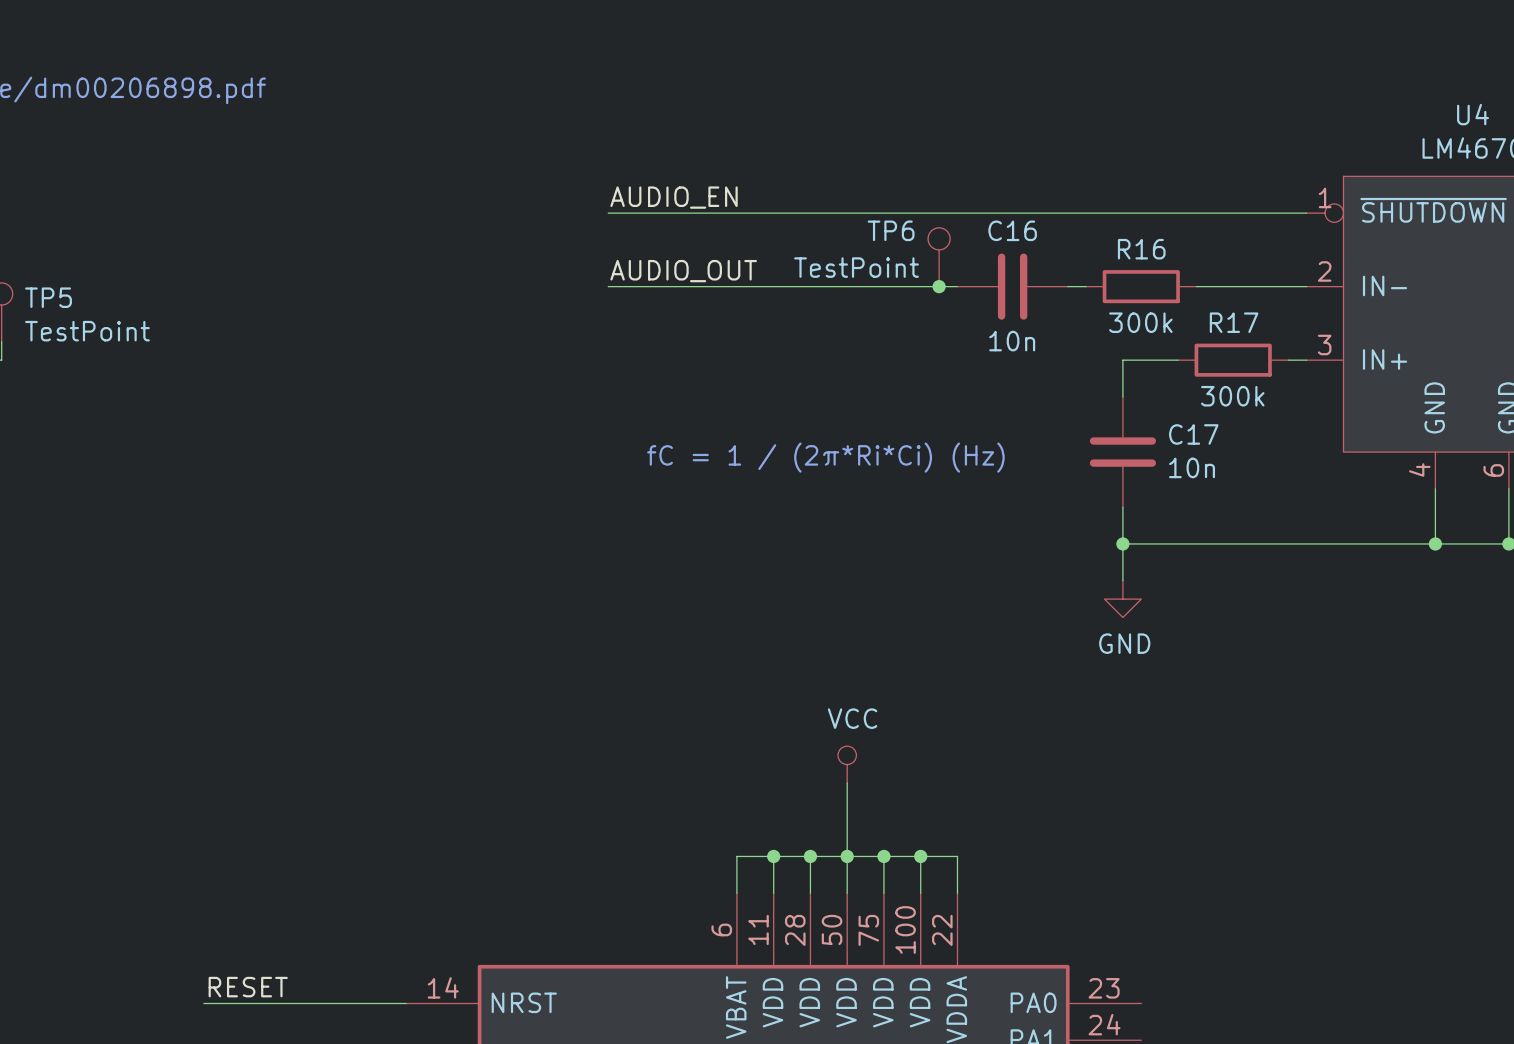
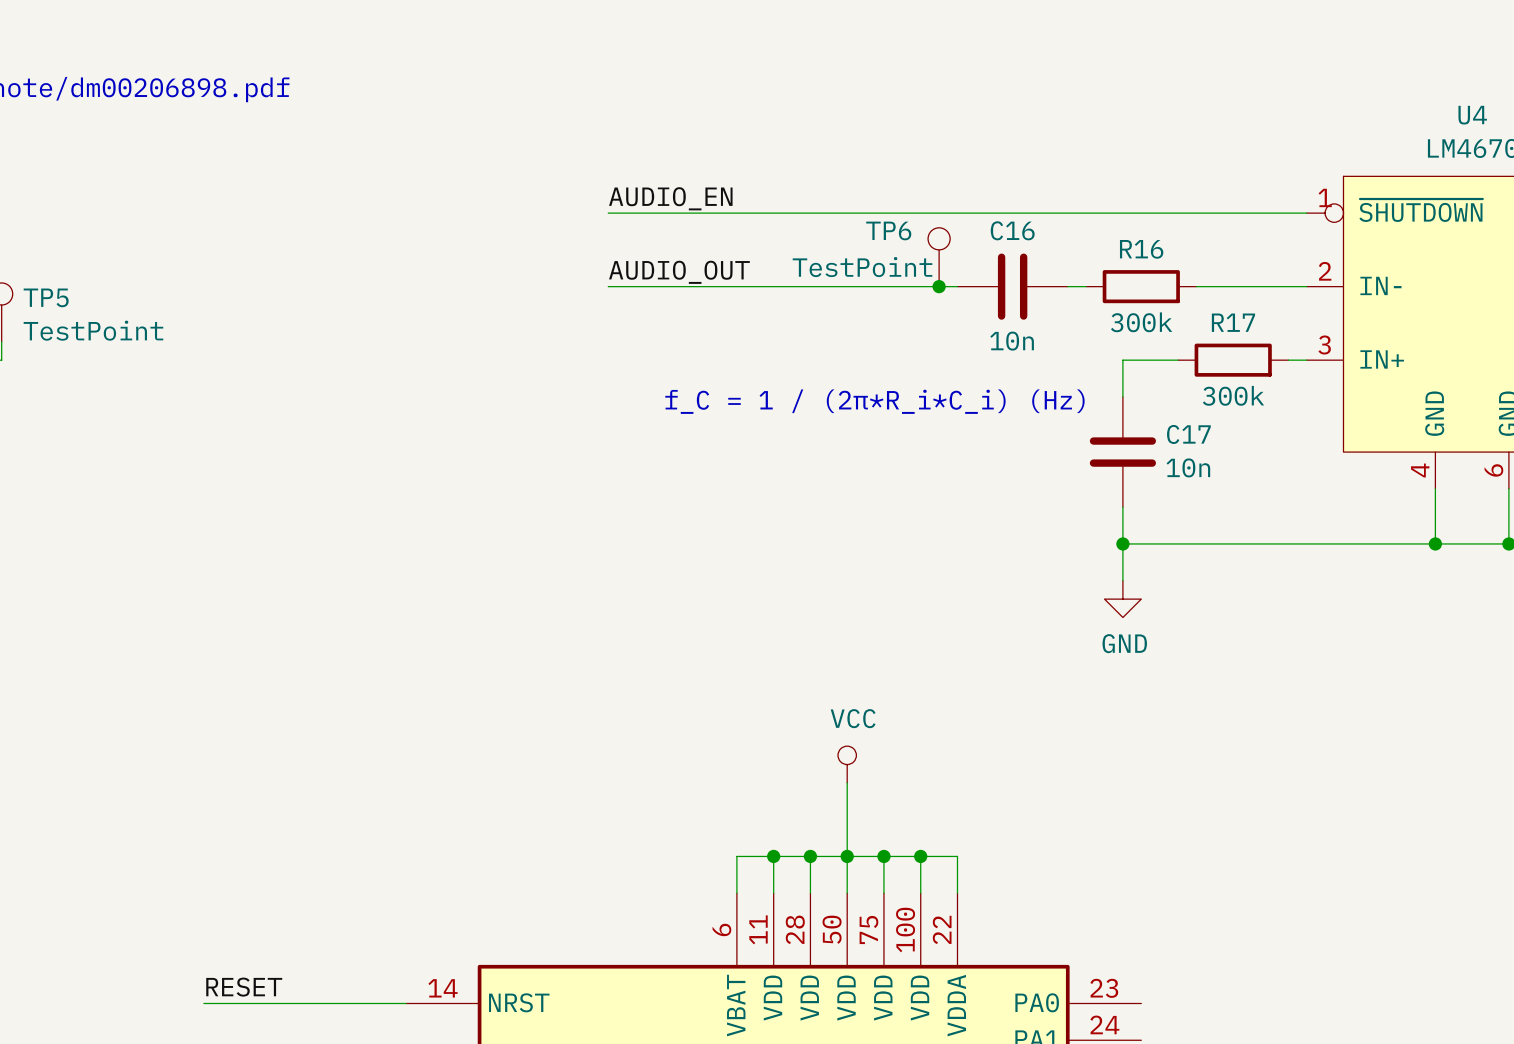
text: none -> f_C = 1 / (2π*R_i*C_i) (Hz) (874, 401)
text: fC = 1 / (2π*Ri*Ci) (Hz) (825, 457) -> none

